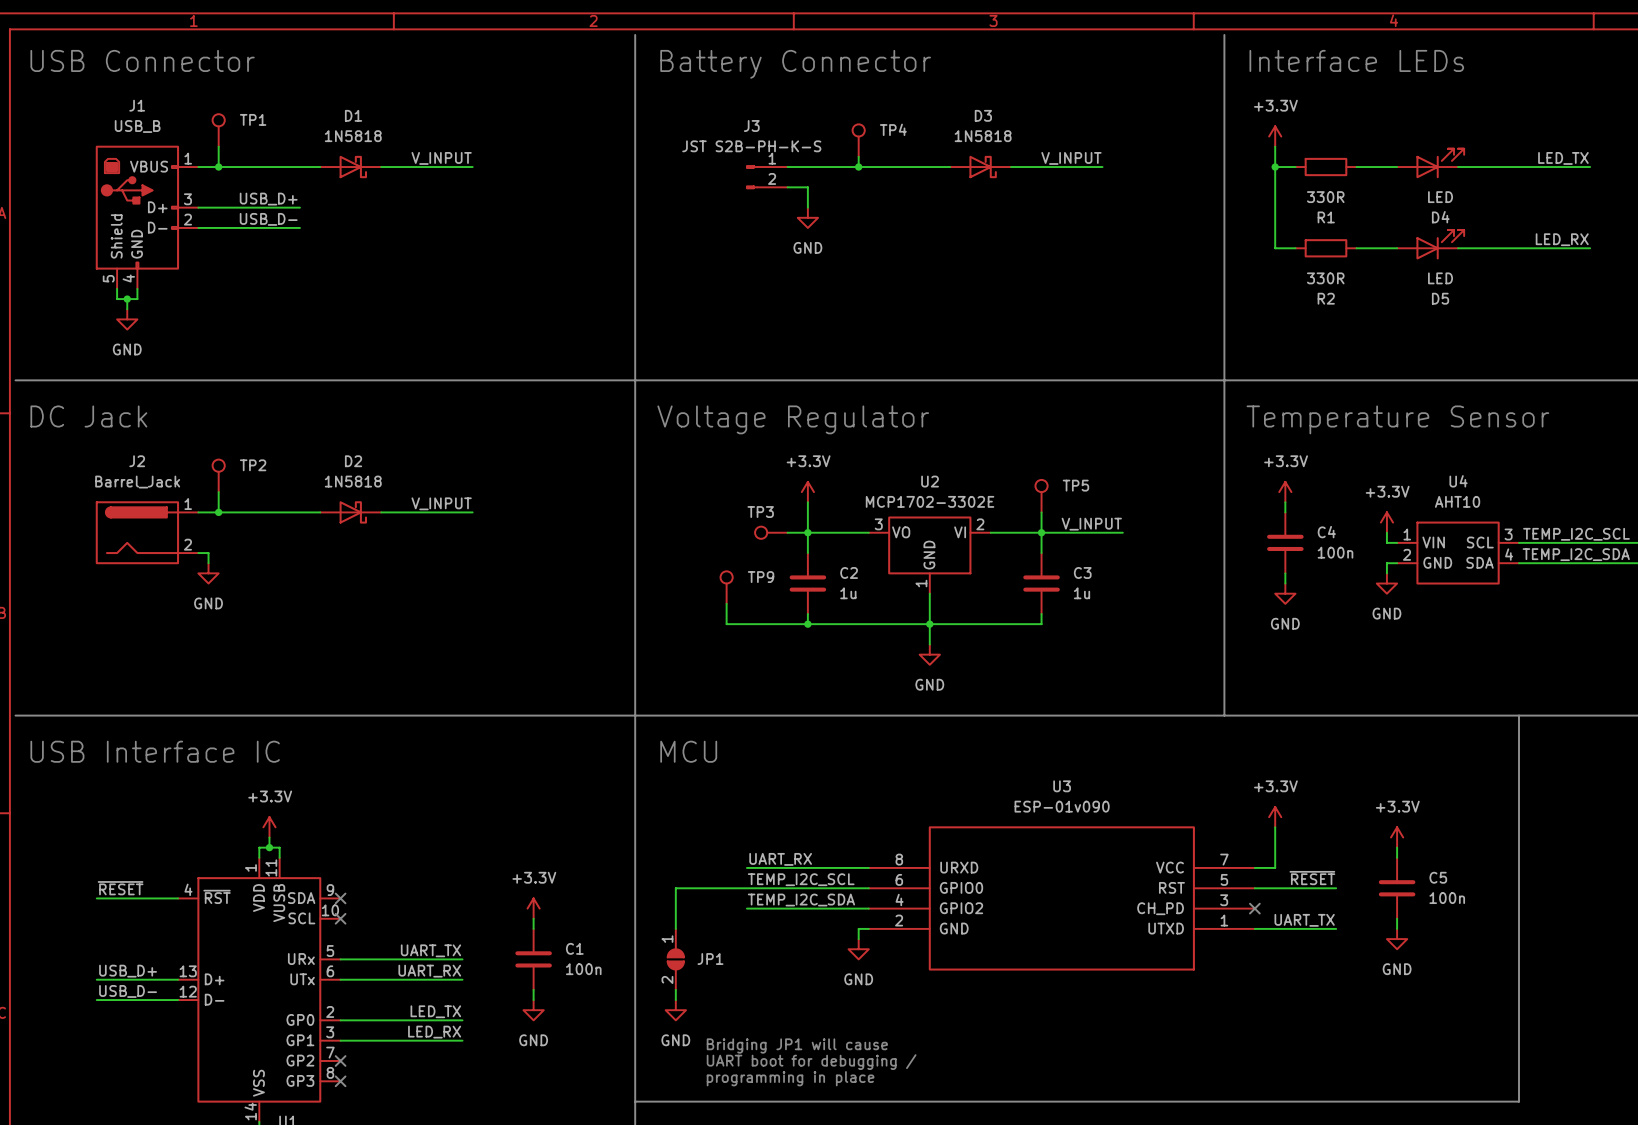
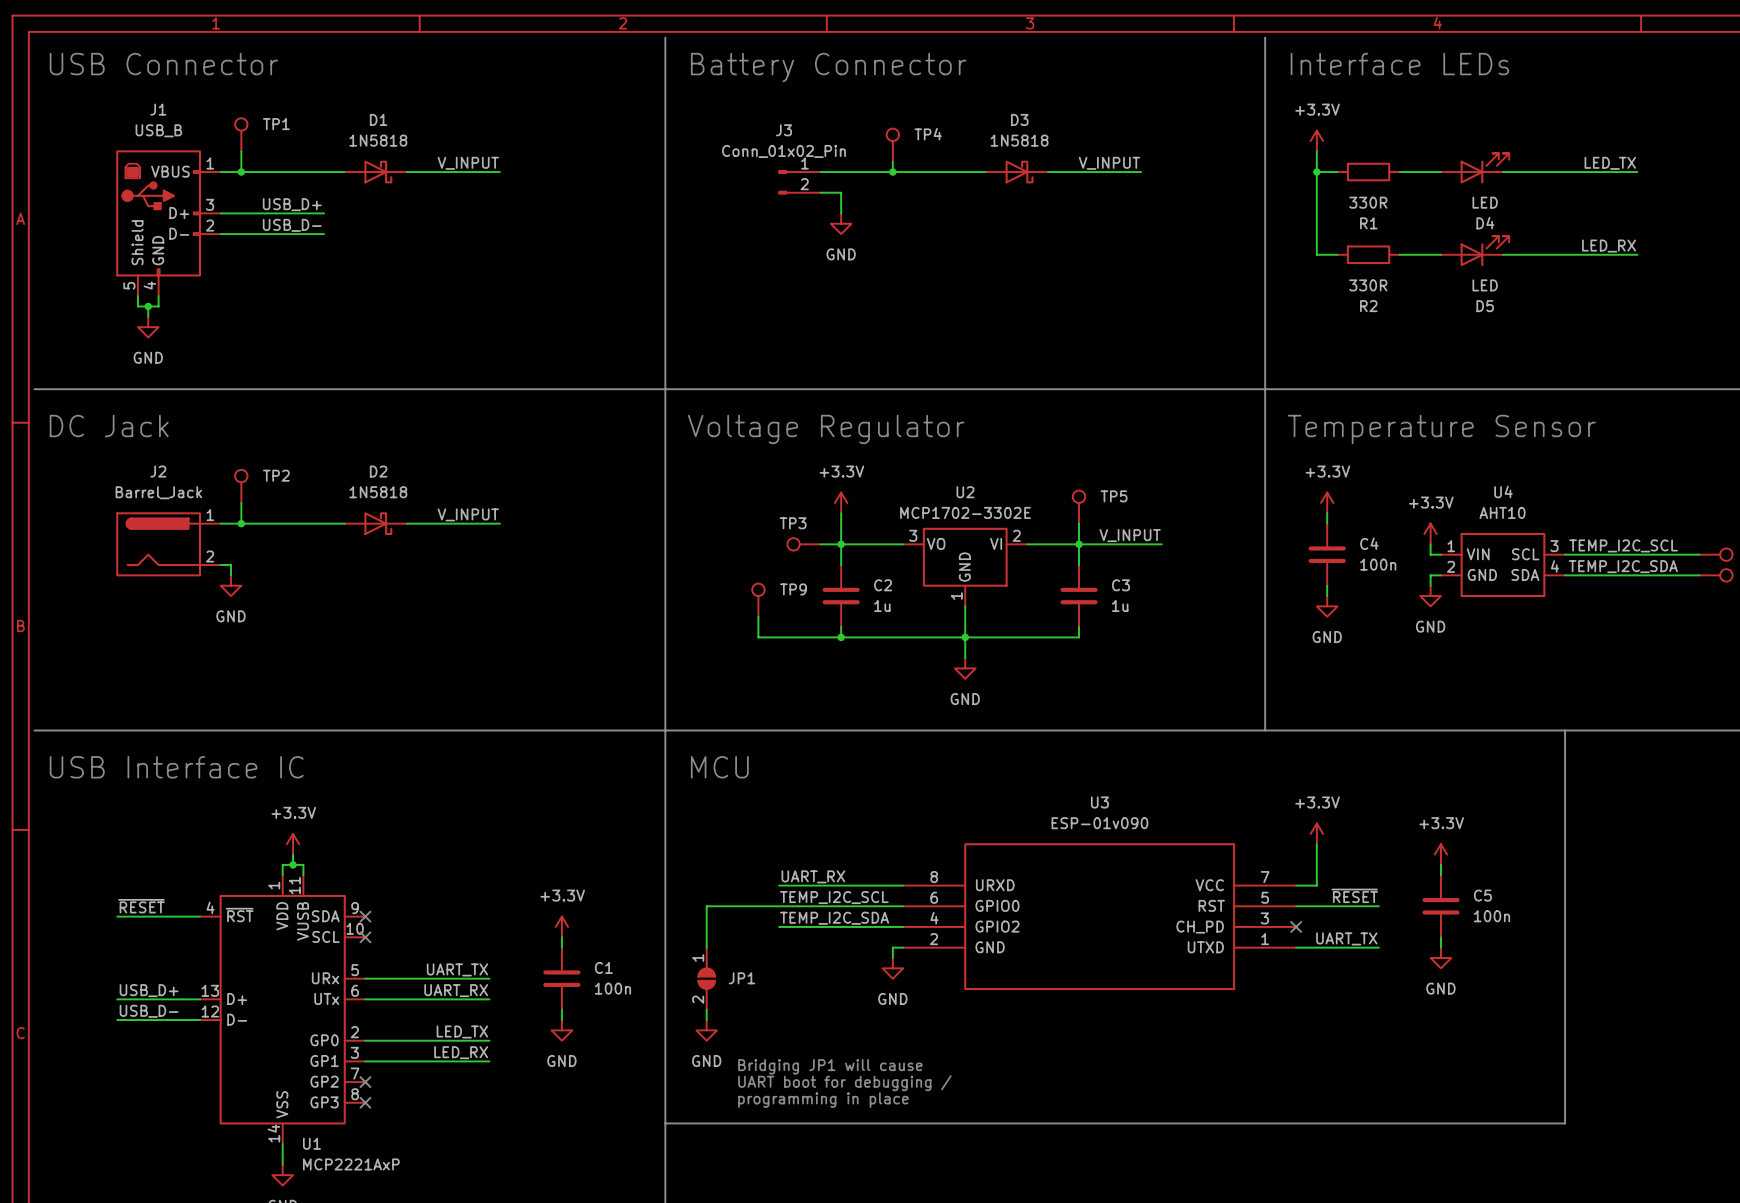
J3 value: JST S2B-PH-K-S (751, 146) -> Conn_01x02_Pin (784, 151)

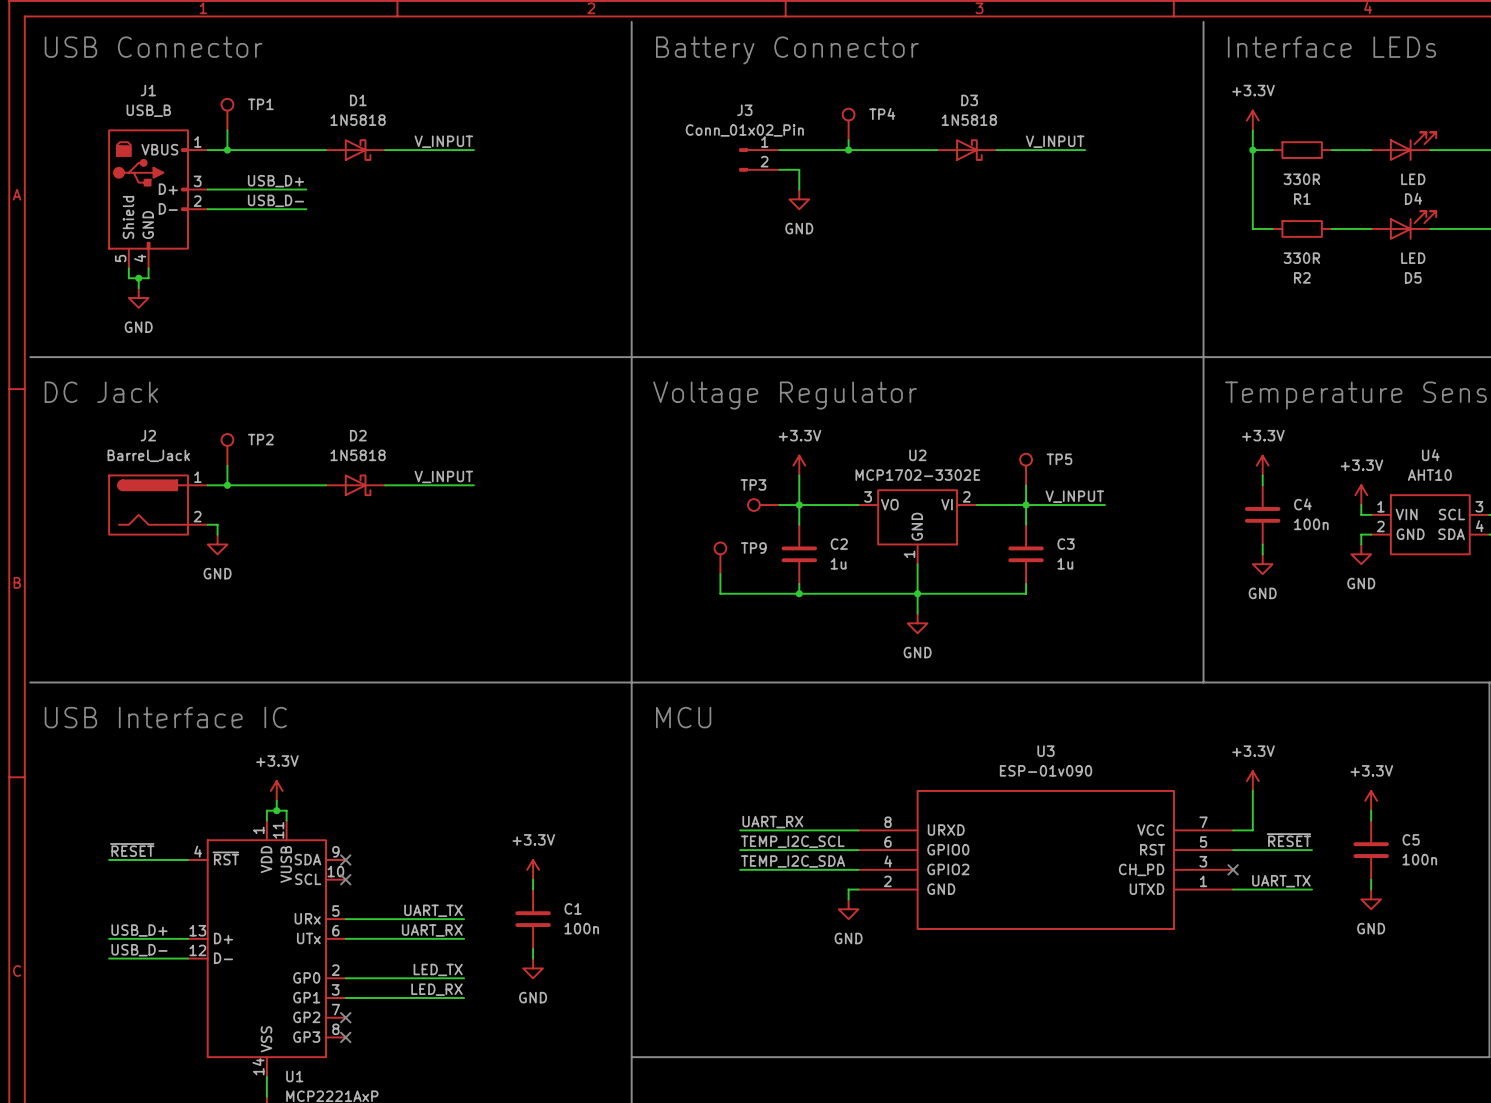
wire: (779, 906) (706, 906) (706, 947) -> none
JP1: (706, 978) -> none
wire: (706, 1009) (706, 1020) -> none
power symbol: GND (706, 1030) -> none
text: Bridging JP1 will cause (830, 1066) -> none
text: UART boot for debugging / (844, 1083) -> none
text: programming in place (823, 1100) -> none

